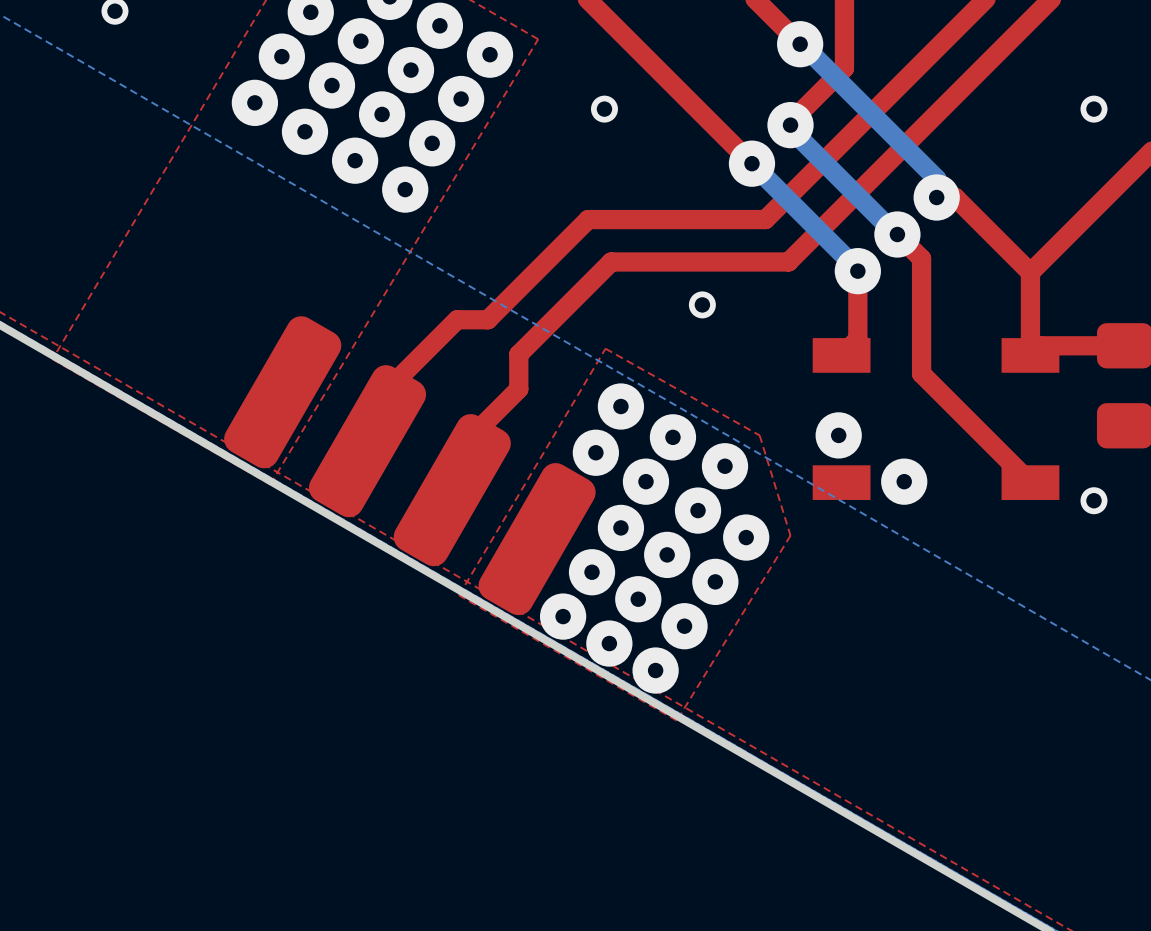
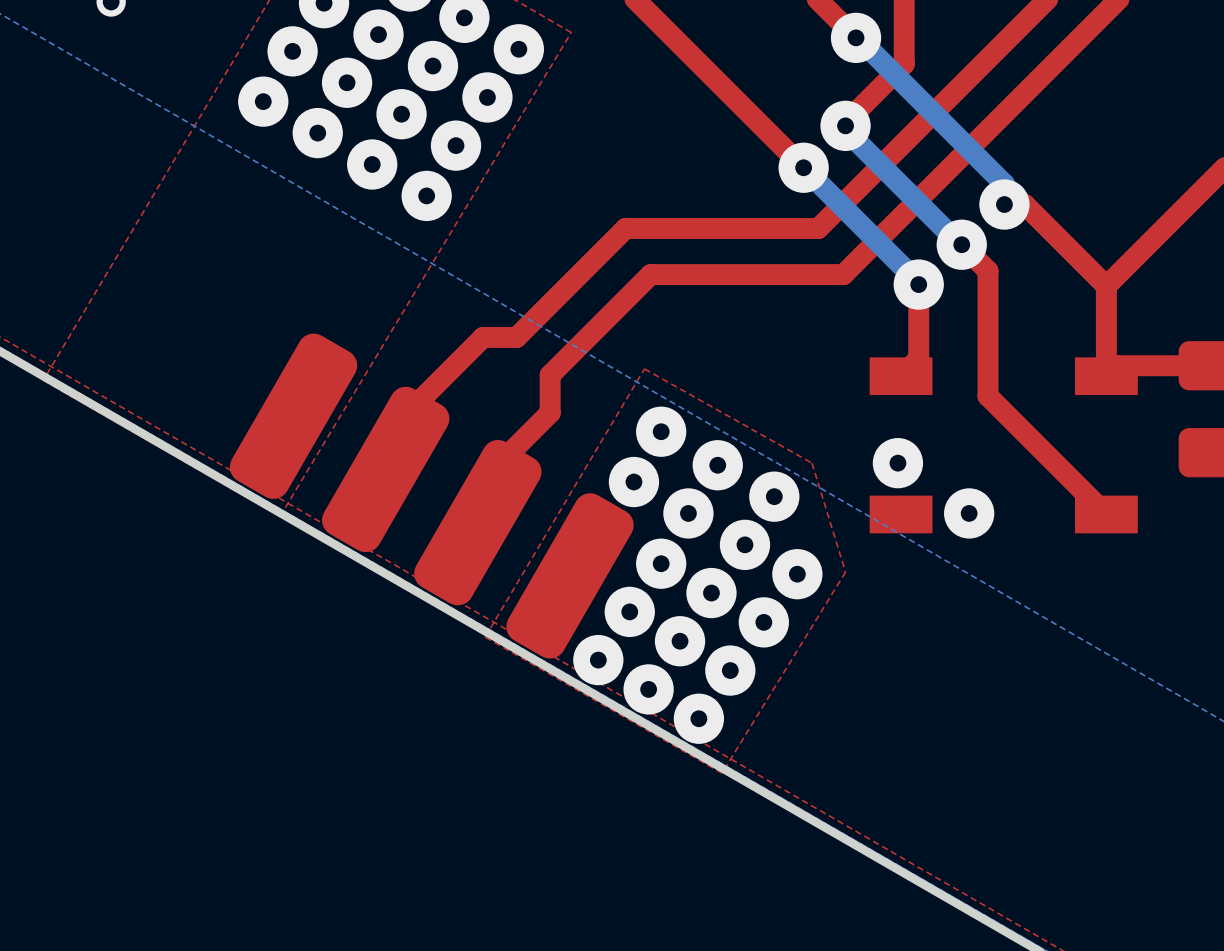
via: (604, 109) -> none
via: (1093, 109) -> none
via: (702, 304) -> none
via: (1093, 500) -> none

